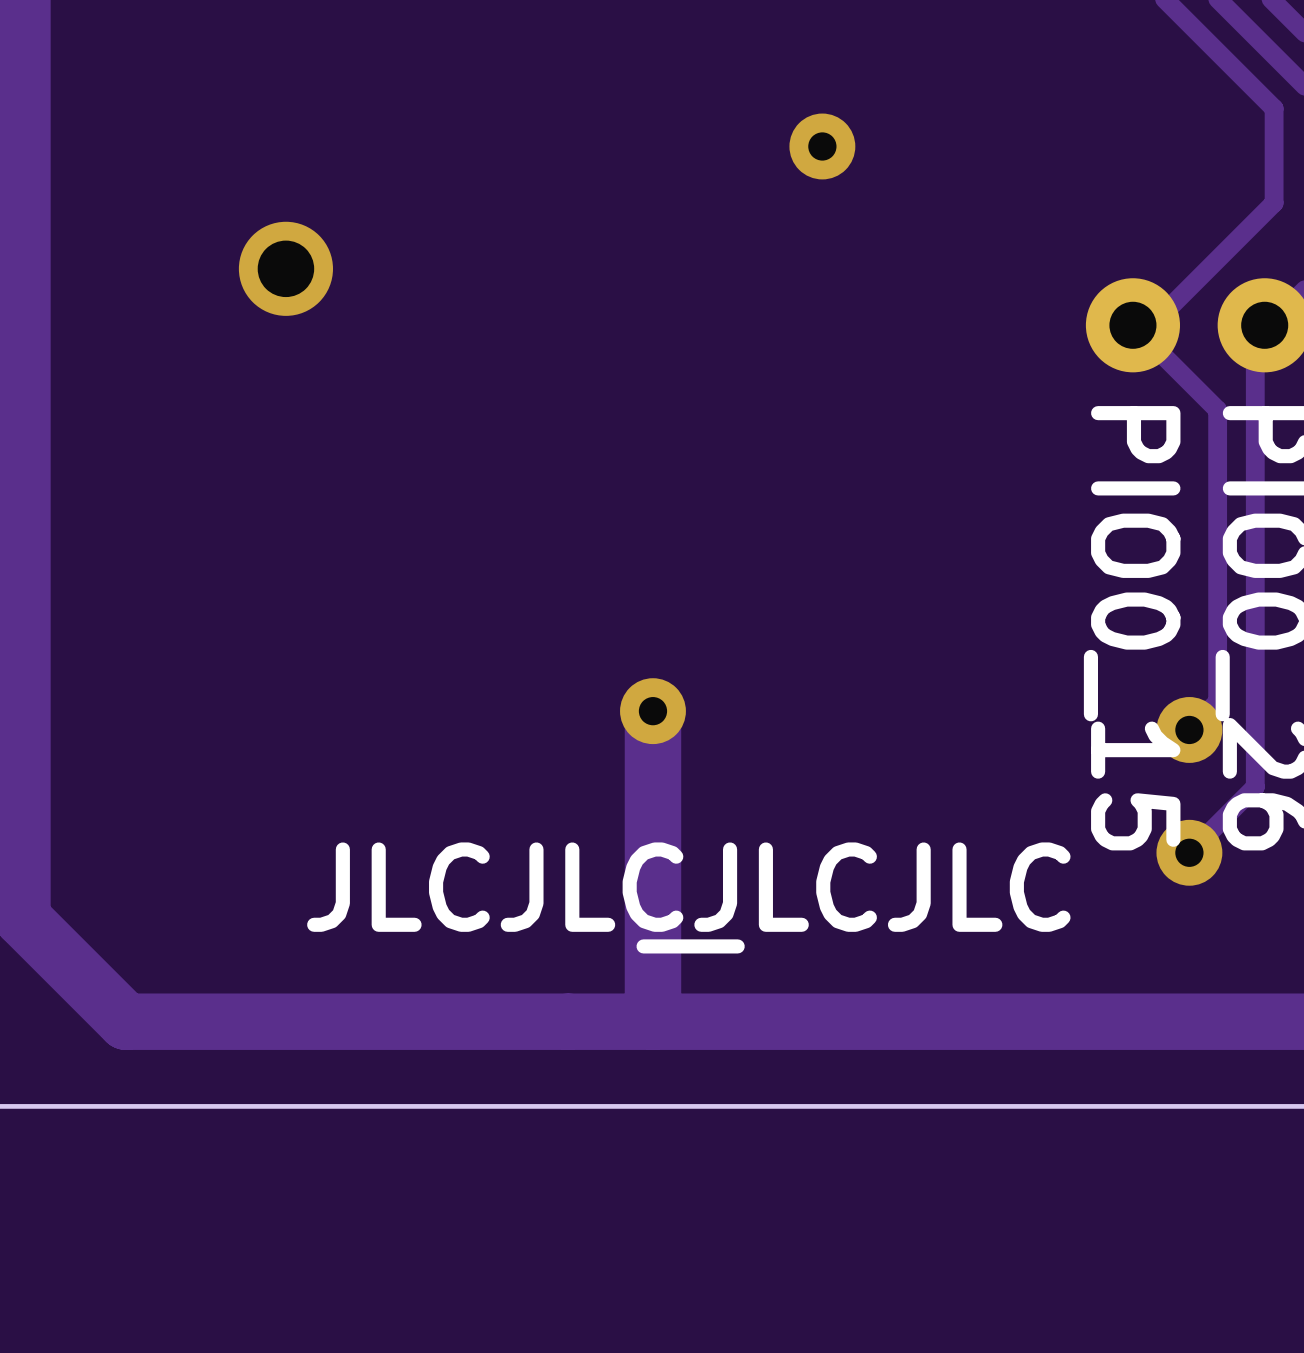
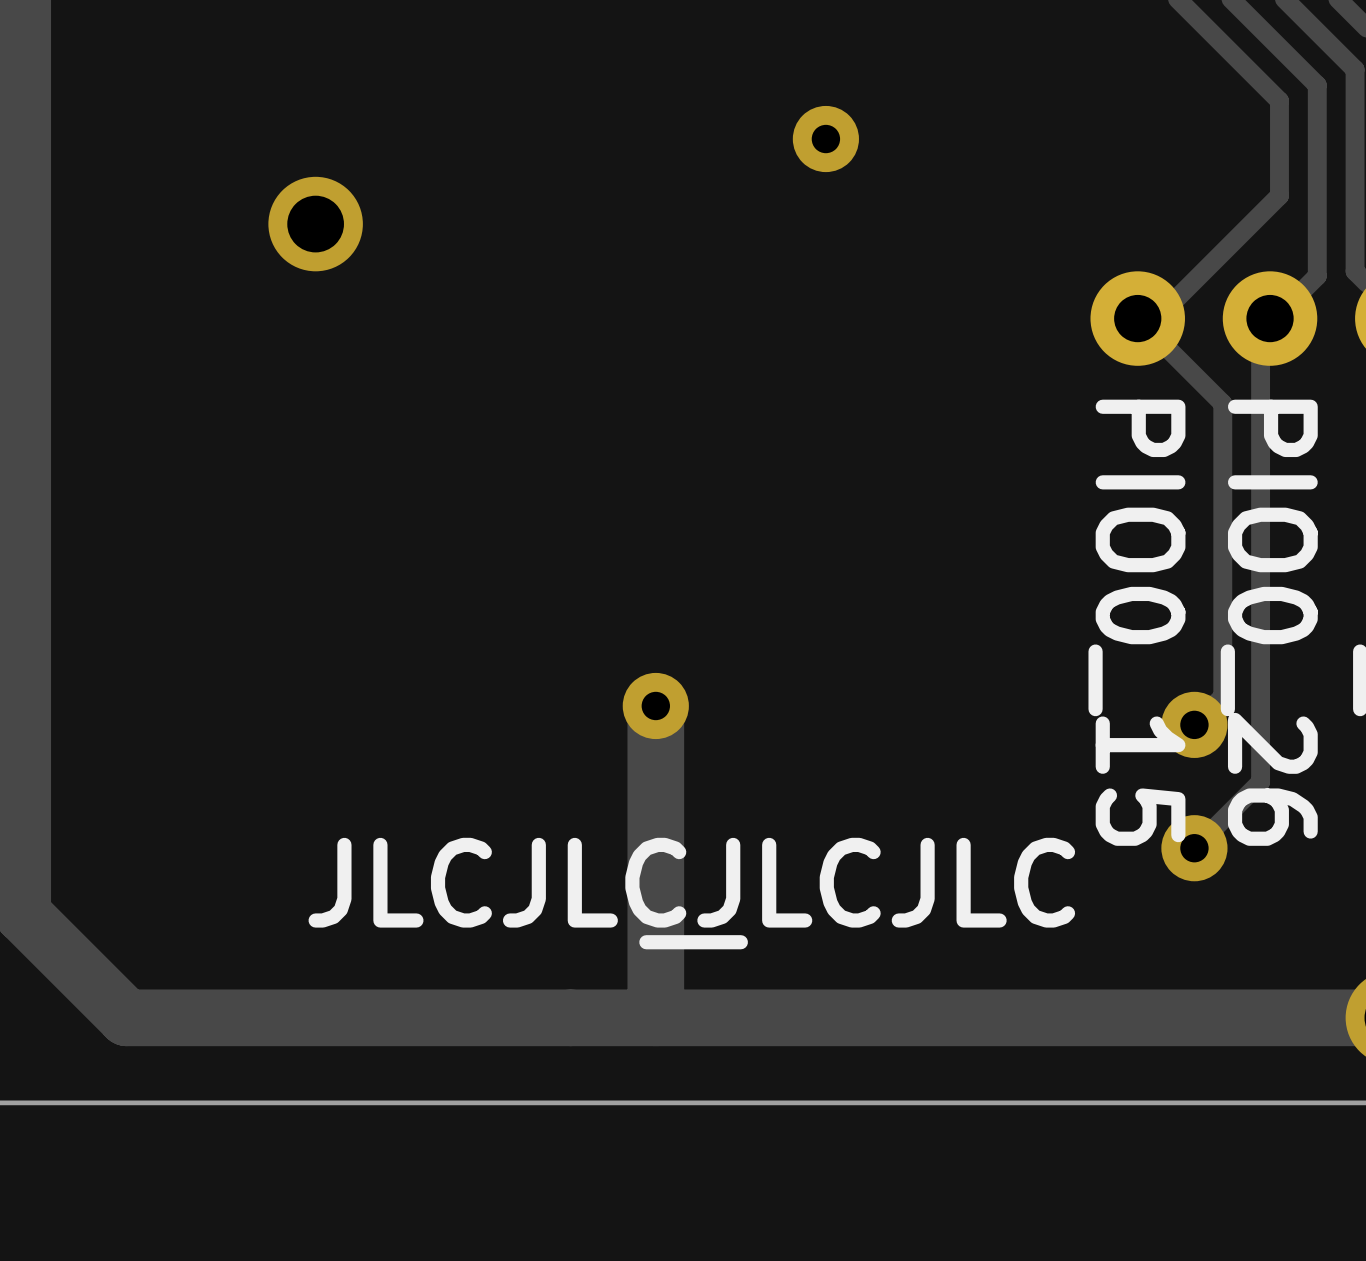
via position: (285, 268) -> (315, 224)

